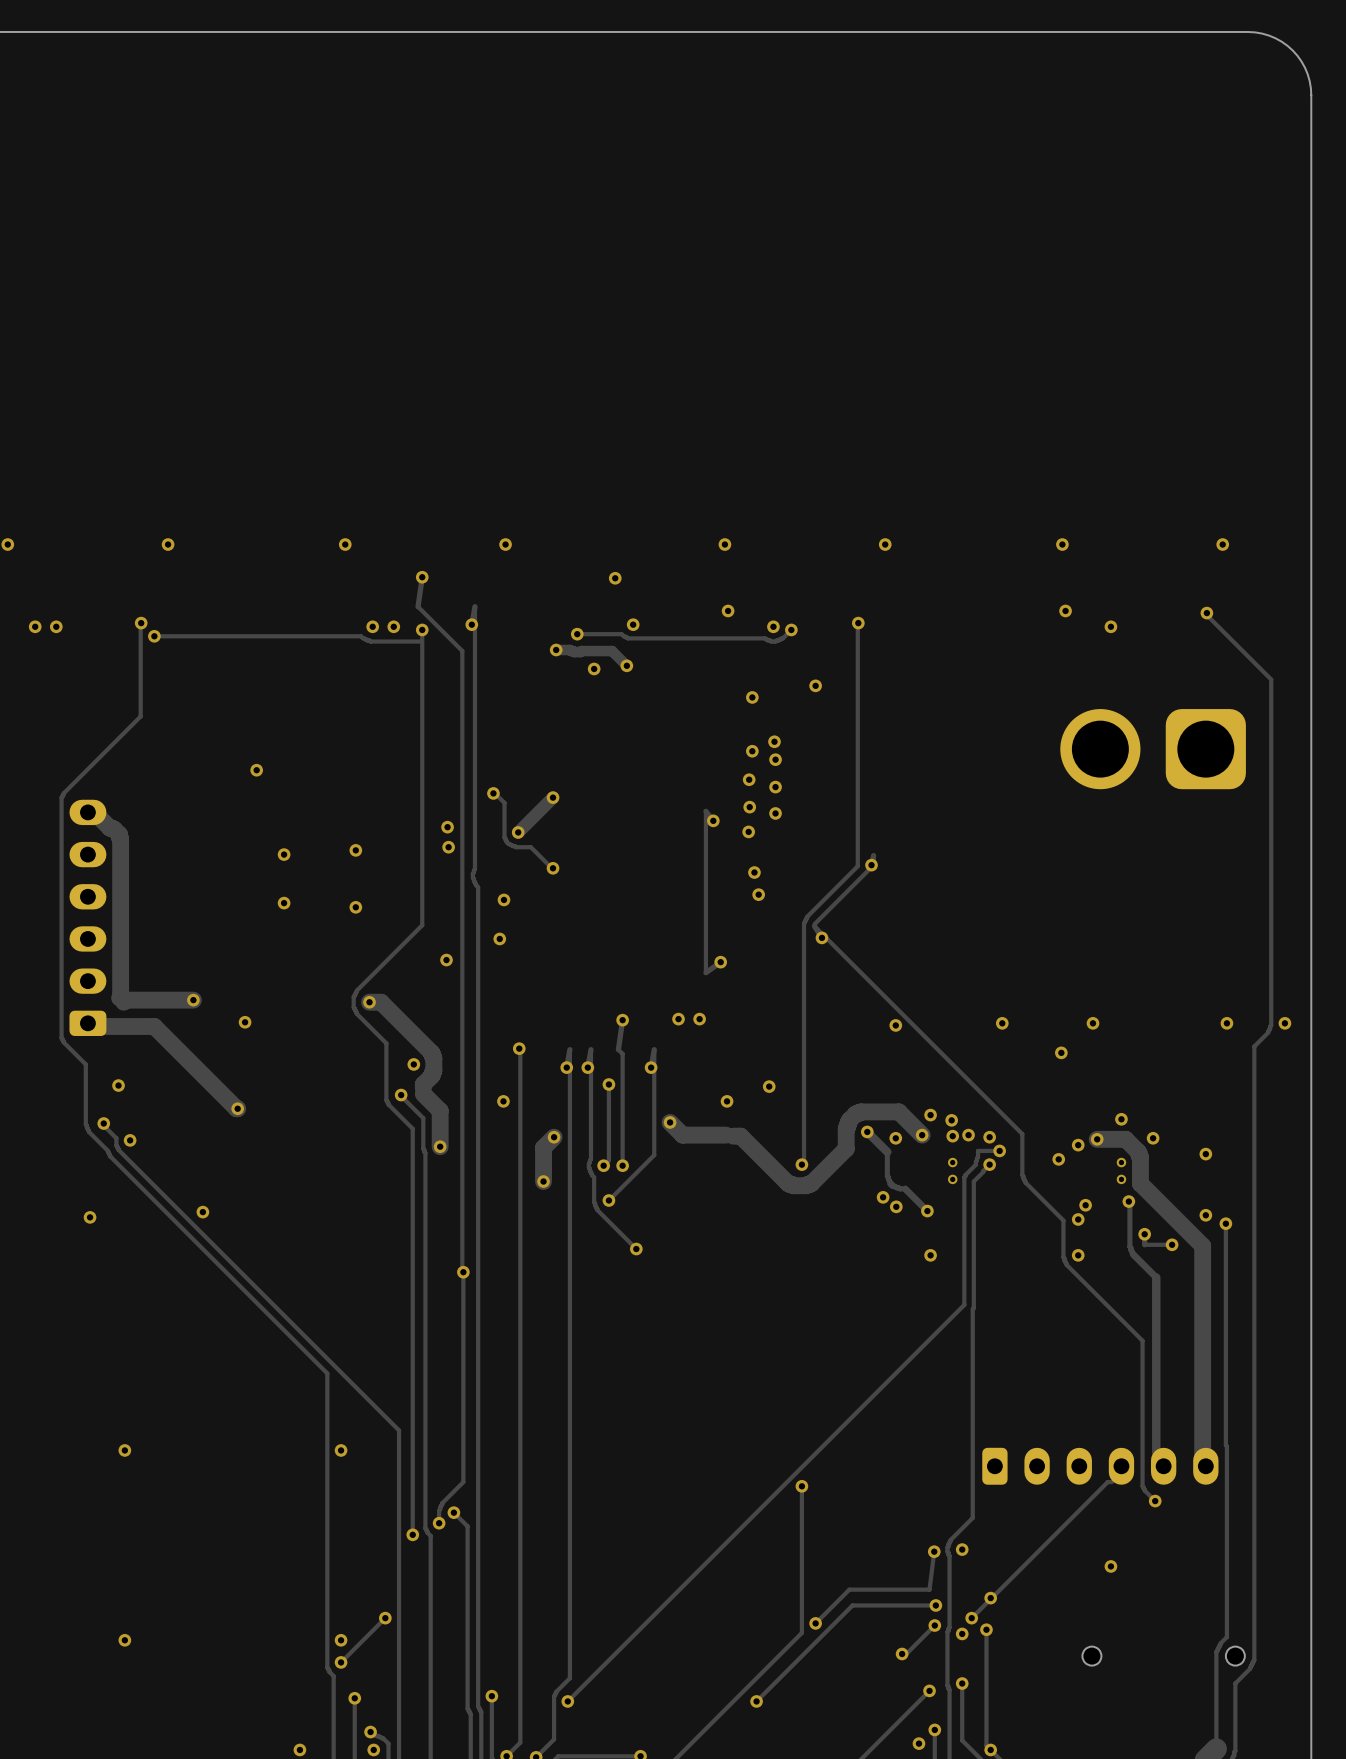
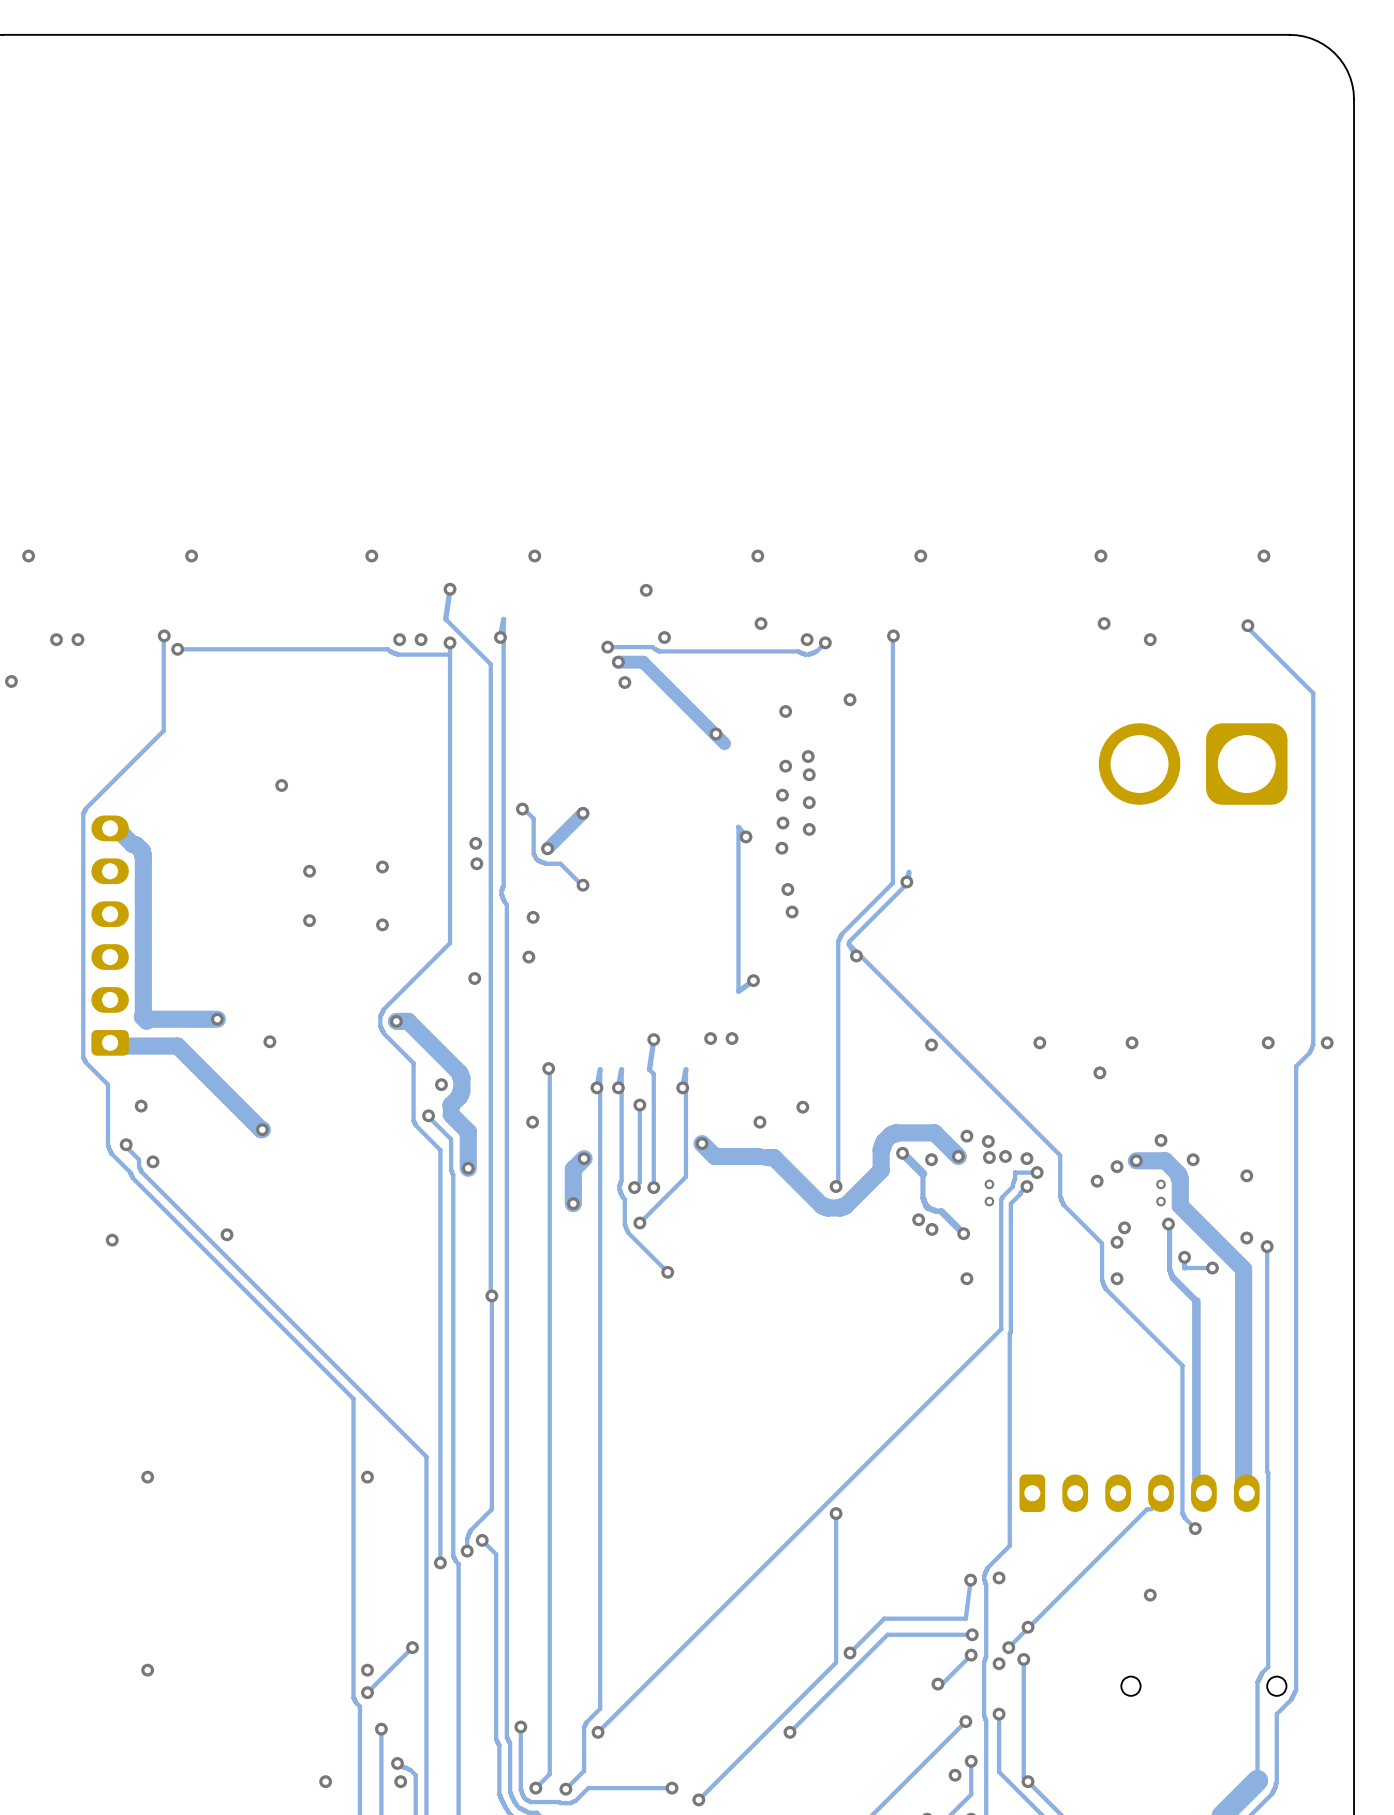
track: none -> (618, 662) (643, 662) (724, 743) (715, 734)
via: none -> (618, 662)
track: (556, 649) (569, 649) (574, 652) (612, 651) (626, 665) -> none
via: (556, 649) -> none
via: (626, 665) -> none
via: none -> (715, 734)

